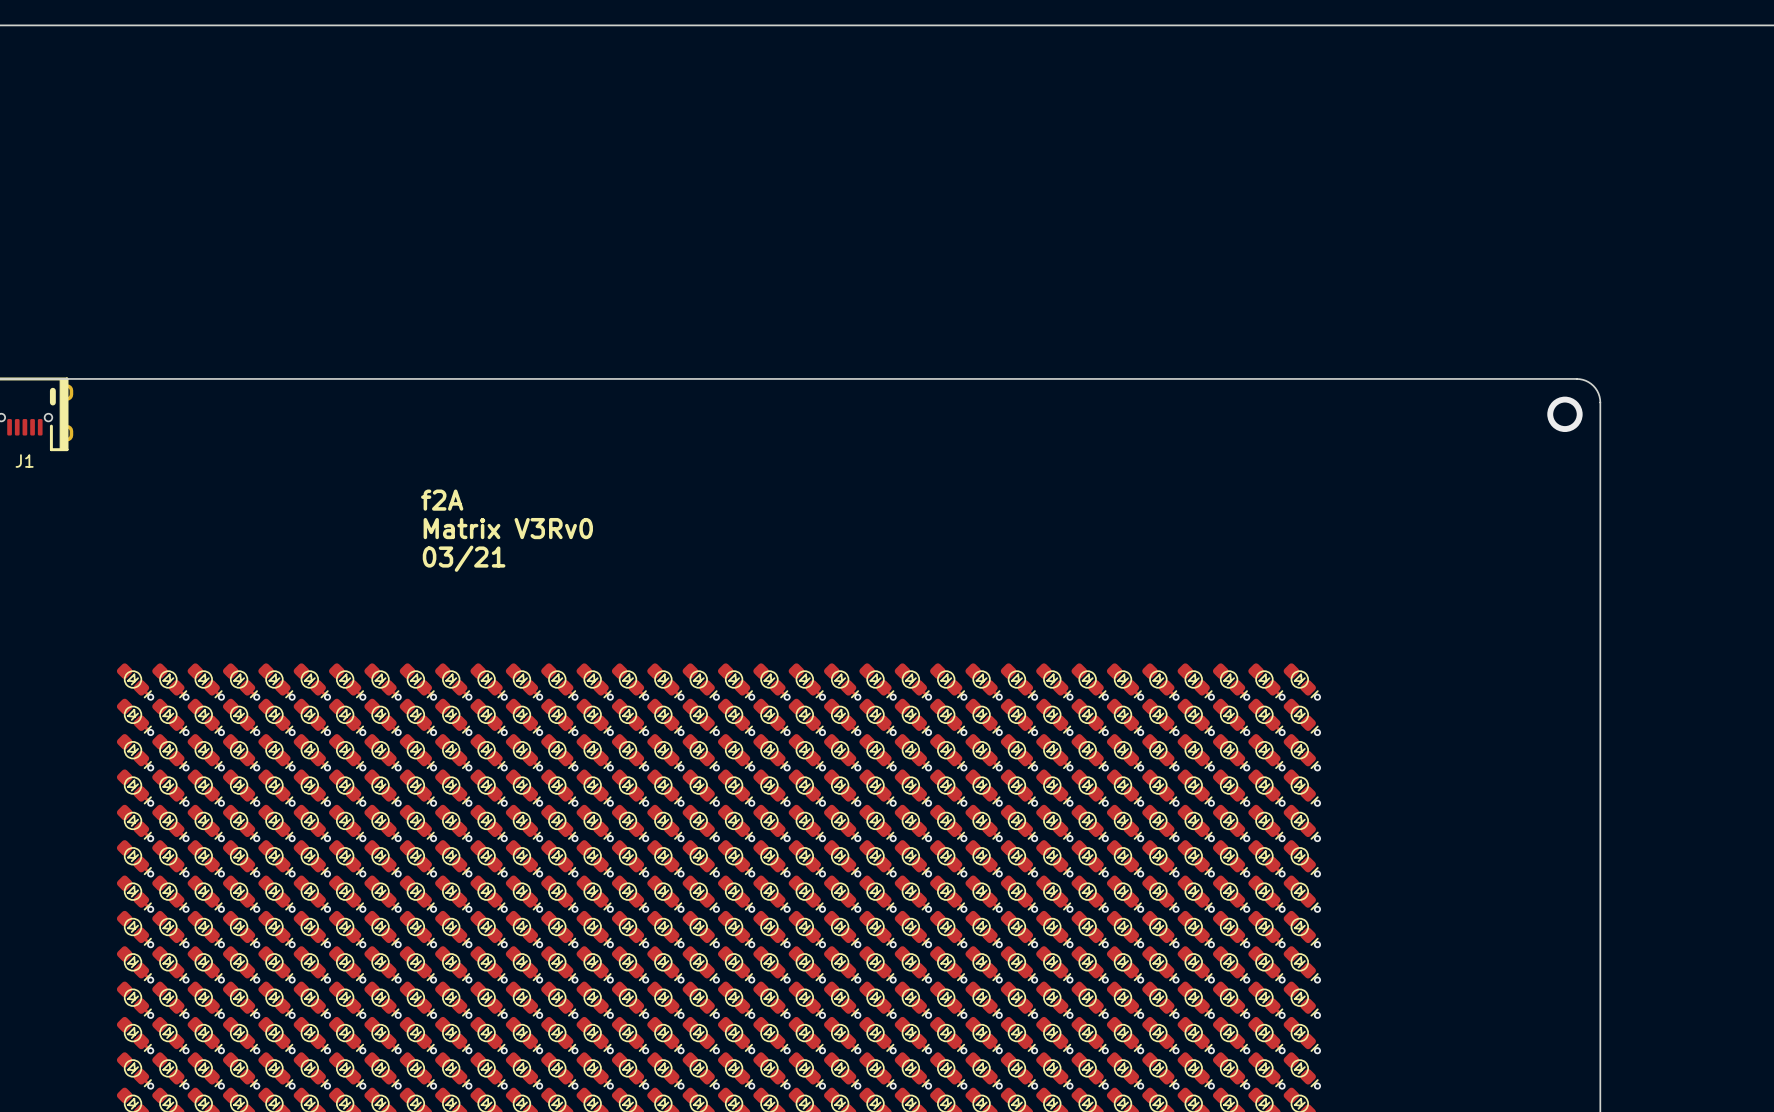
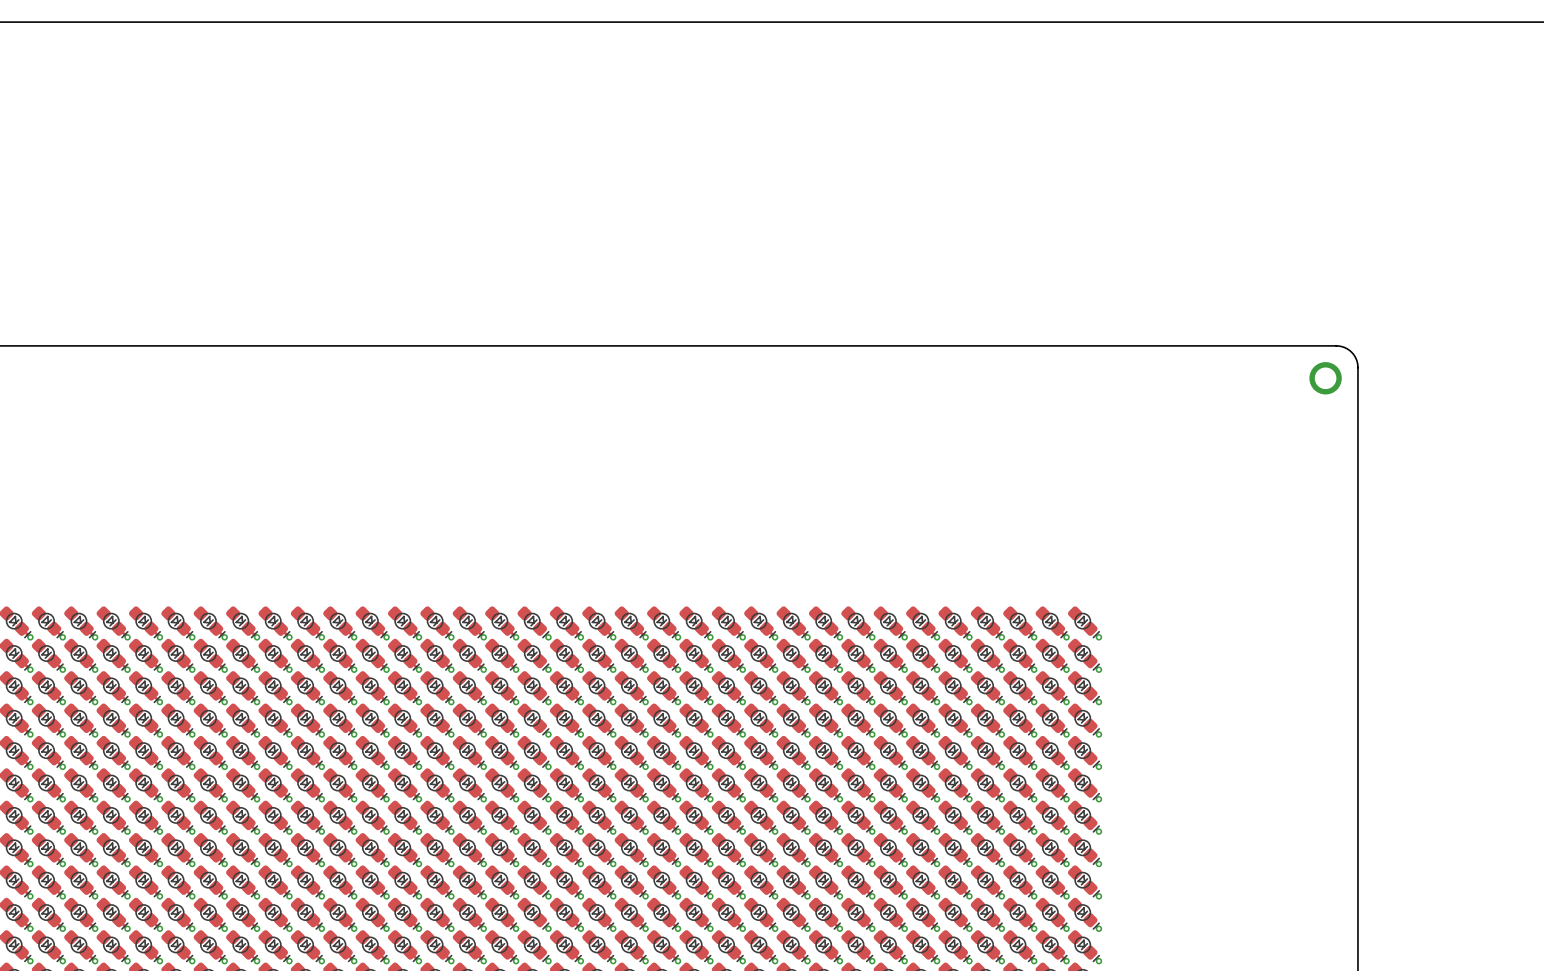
text: f2A (442, 500) -> none
text: Matrix V3Rv0 (508, 528) -> none
text: 03/21 (464, 558) -> none

